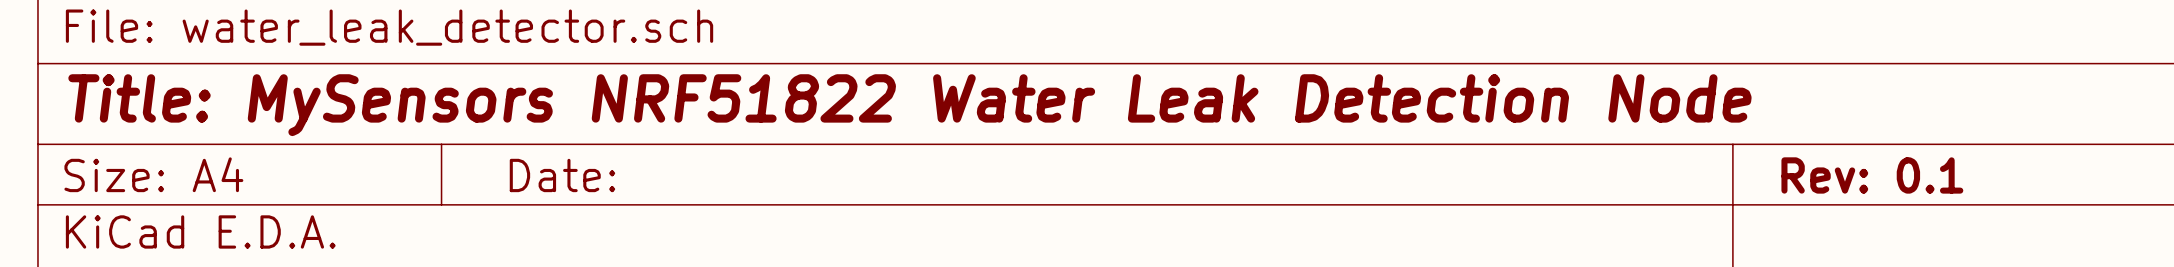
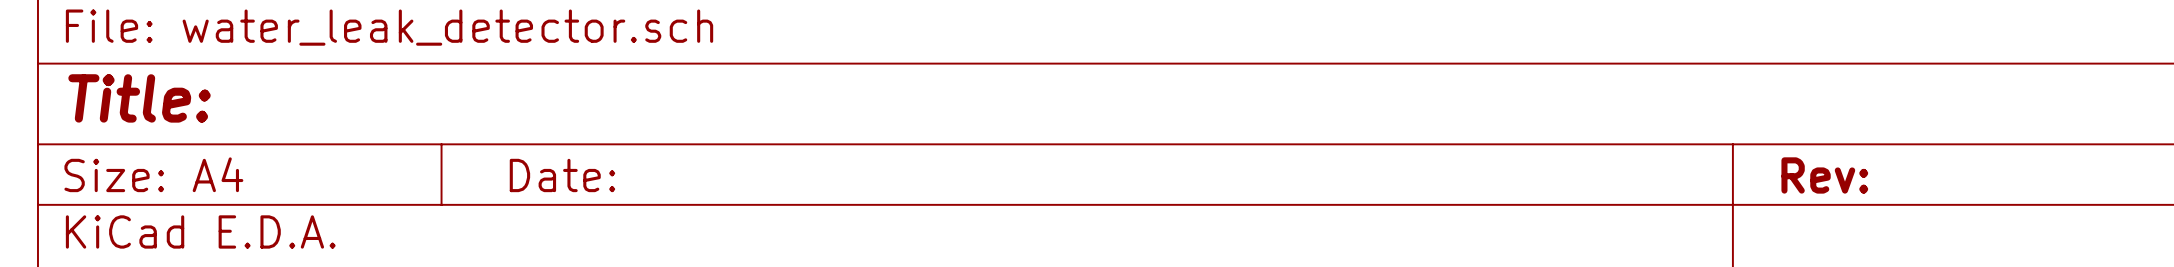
title block: Title: MySensors NRF51822 Water Leak Detection Node (909, 105) -> Title: (139, 98)
title block: Rev: 0.1 (1872, 175) -> Rev: (1824, 175)

